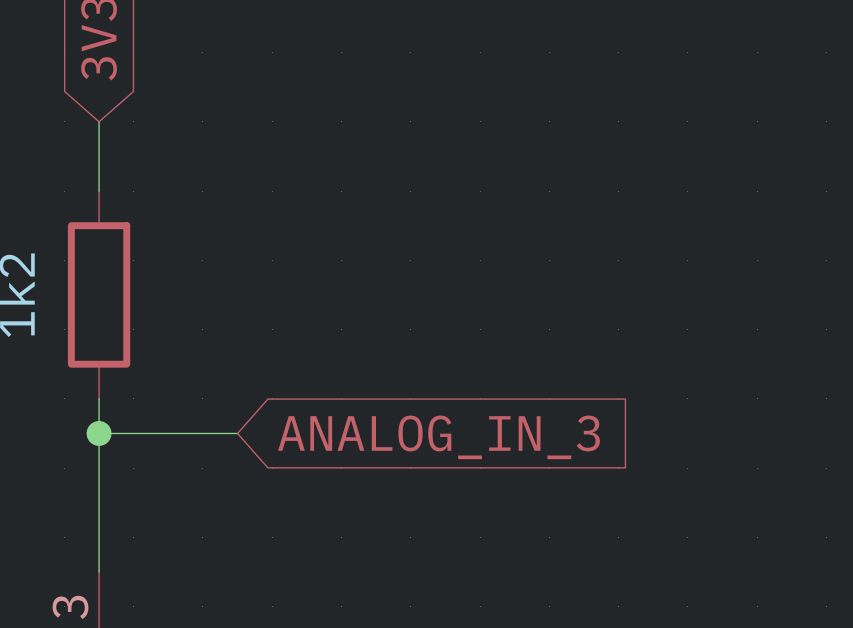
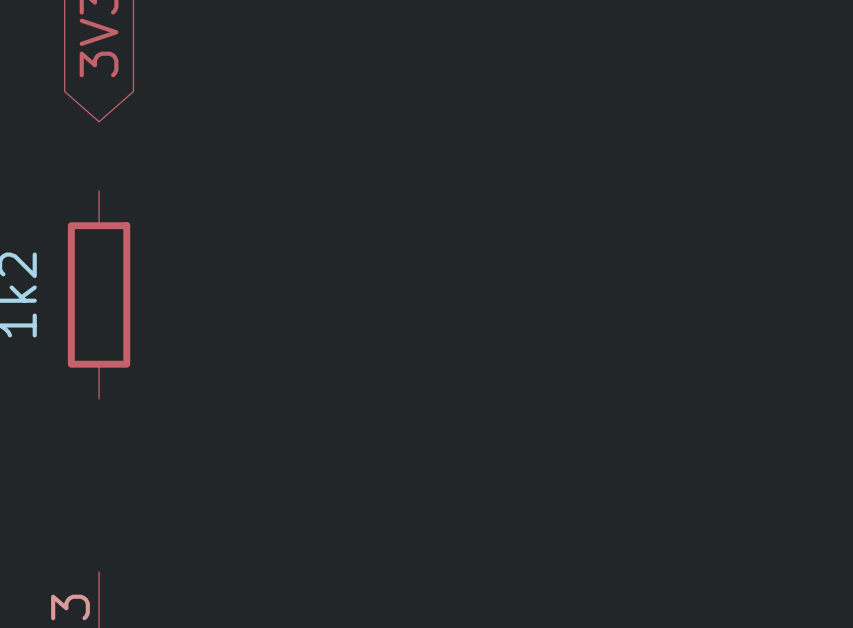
wire: (99, 121) (99, 191) -> none
wire: (99, 398) (99, 572) -> none
wire: (99, 433) (237, 433) -> none
junction: (99, 433) -> none
global label: ANALOG_IN_3 (439, 437) -> none

